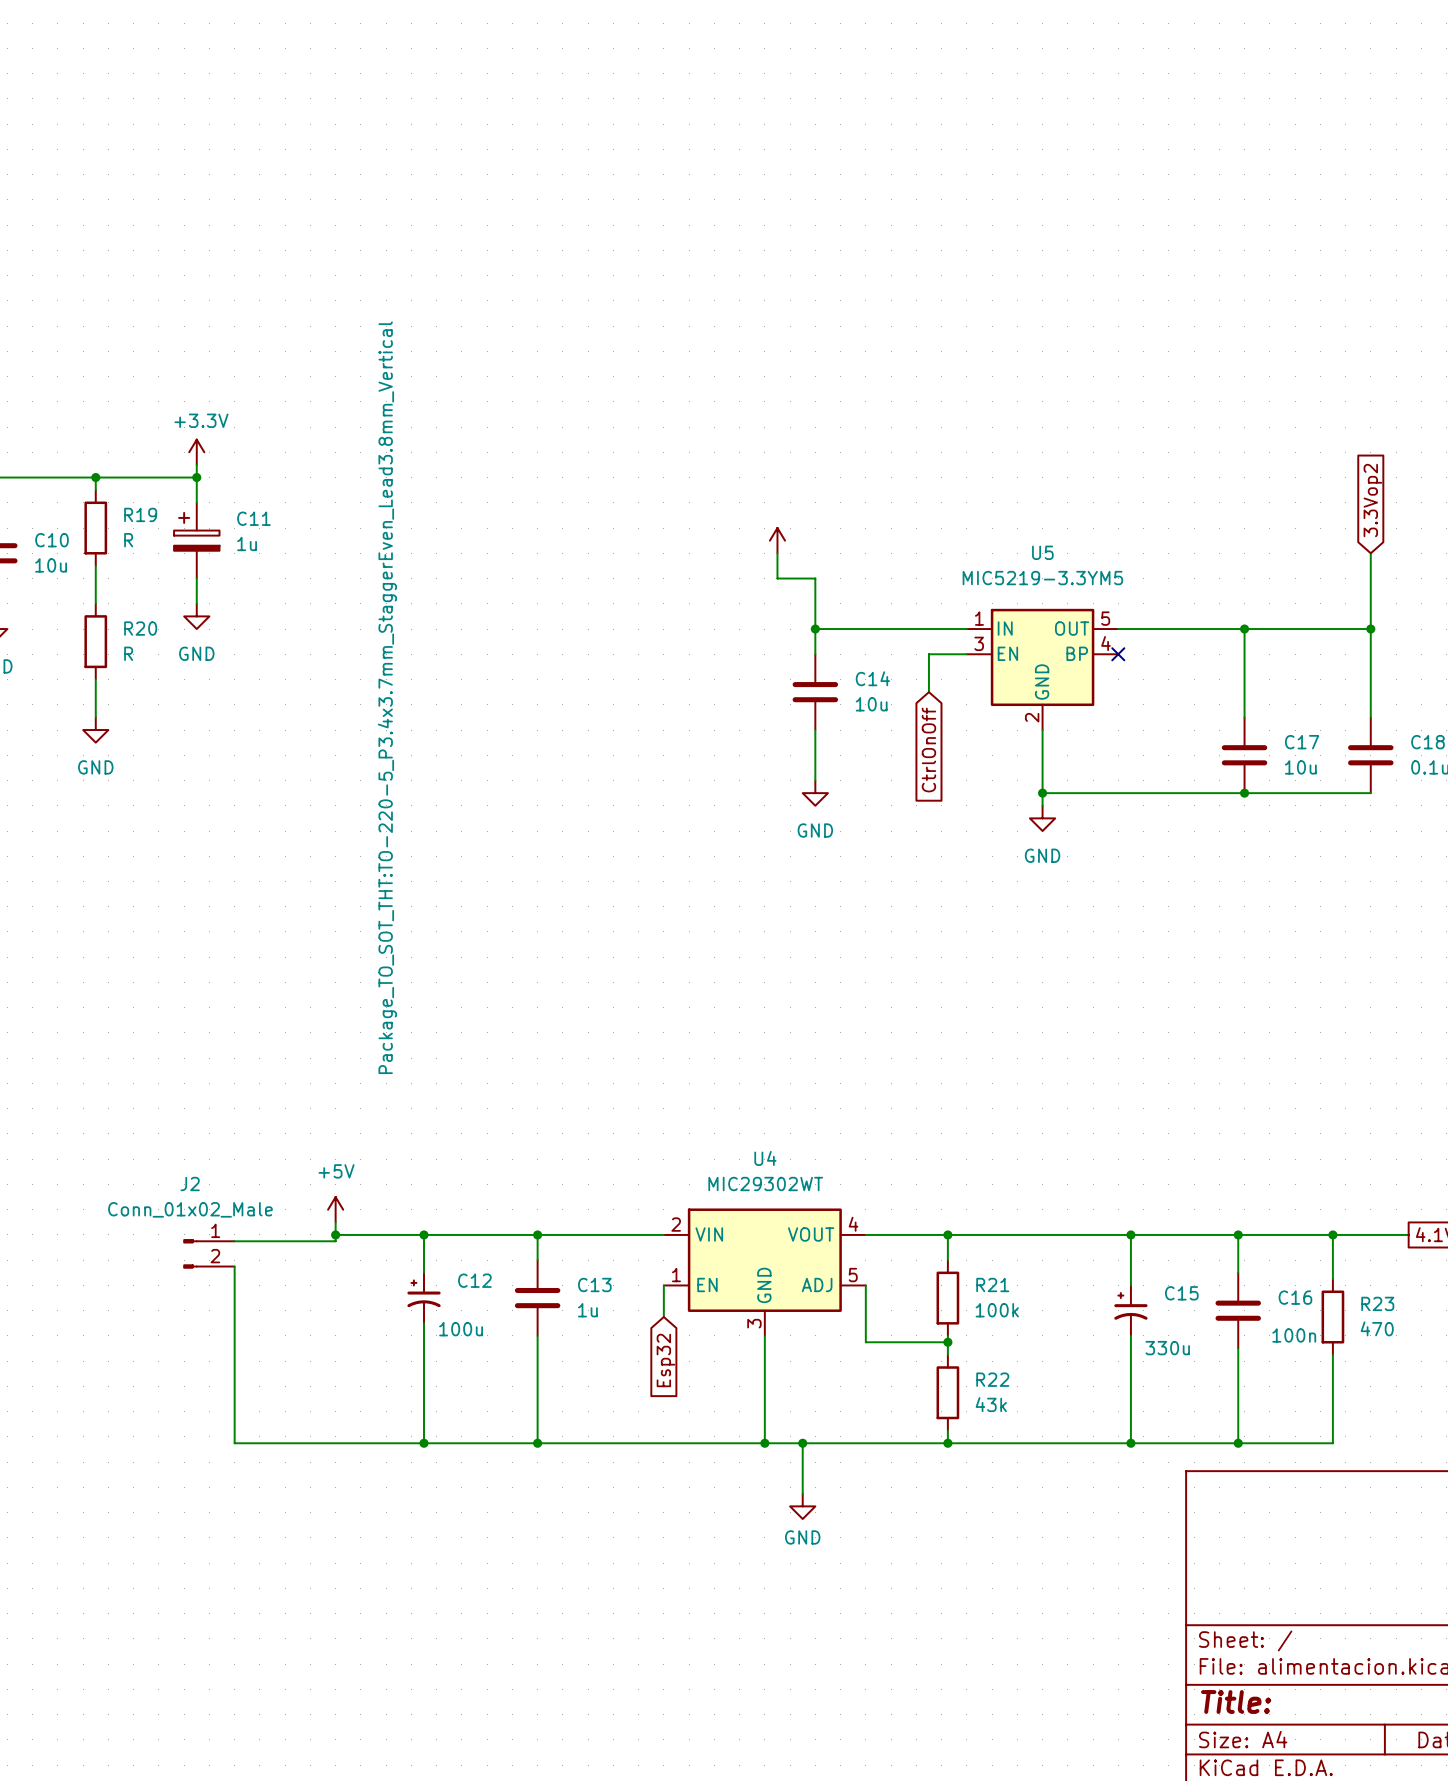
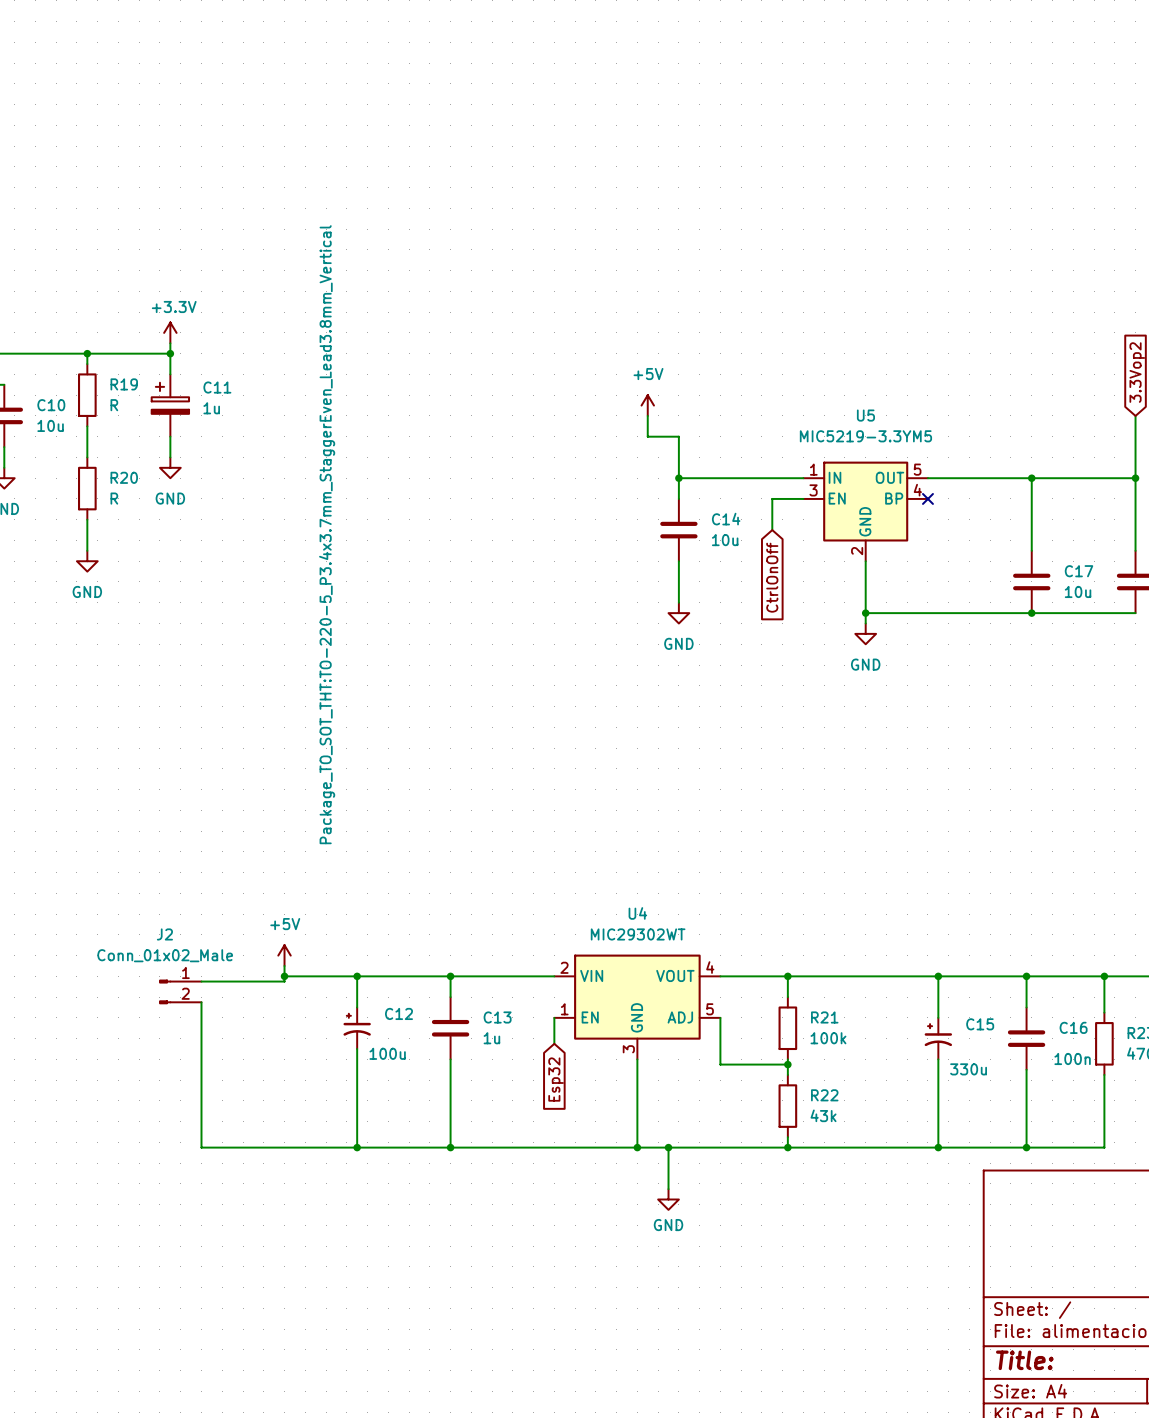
power symbol text: none -> +5V (648, 374)

